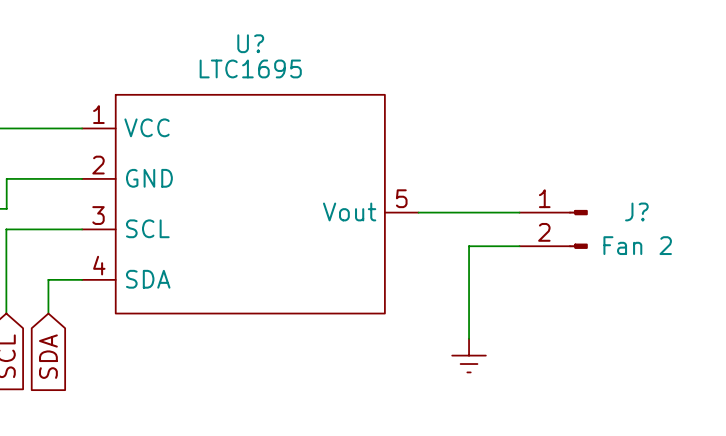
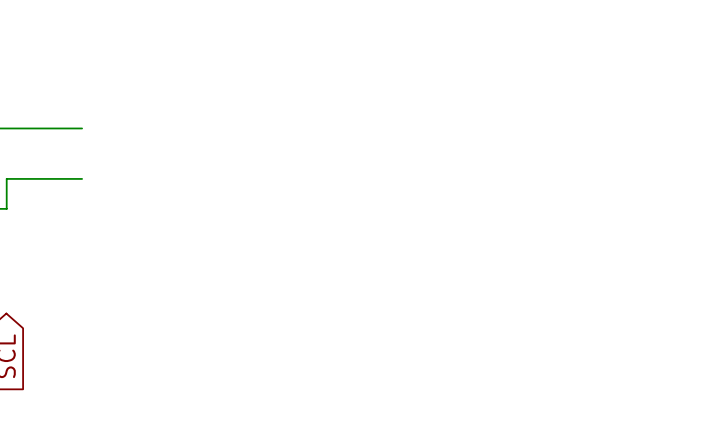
U?: LTC1695 (250, 204) -> none
wire: (418, 212) (519, 212) -> none
wire: (82, 229) (6, 229) (6, 313) -> none
J?: Fan 2 (553, 229) -> none
wire: (519, 246) (469, 246) (469, 338) -> none
wire: (82, 279) (48, 279) (48, 313) -> none
power symbol: (469, 355) -> none
global label: SDA (48, 356) -> none

